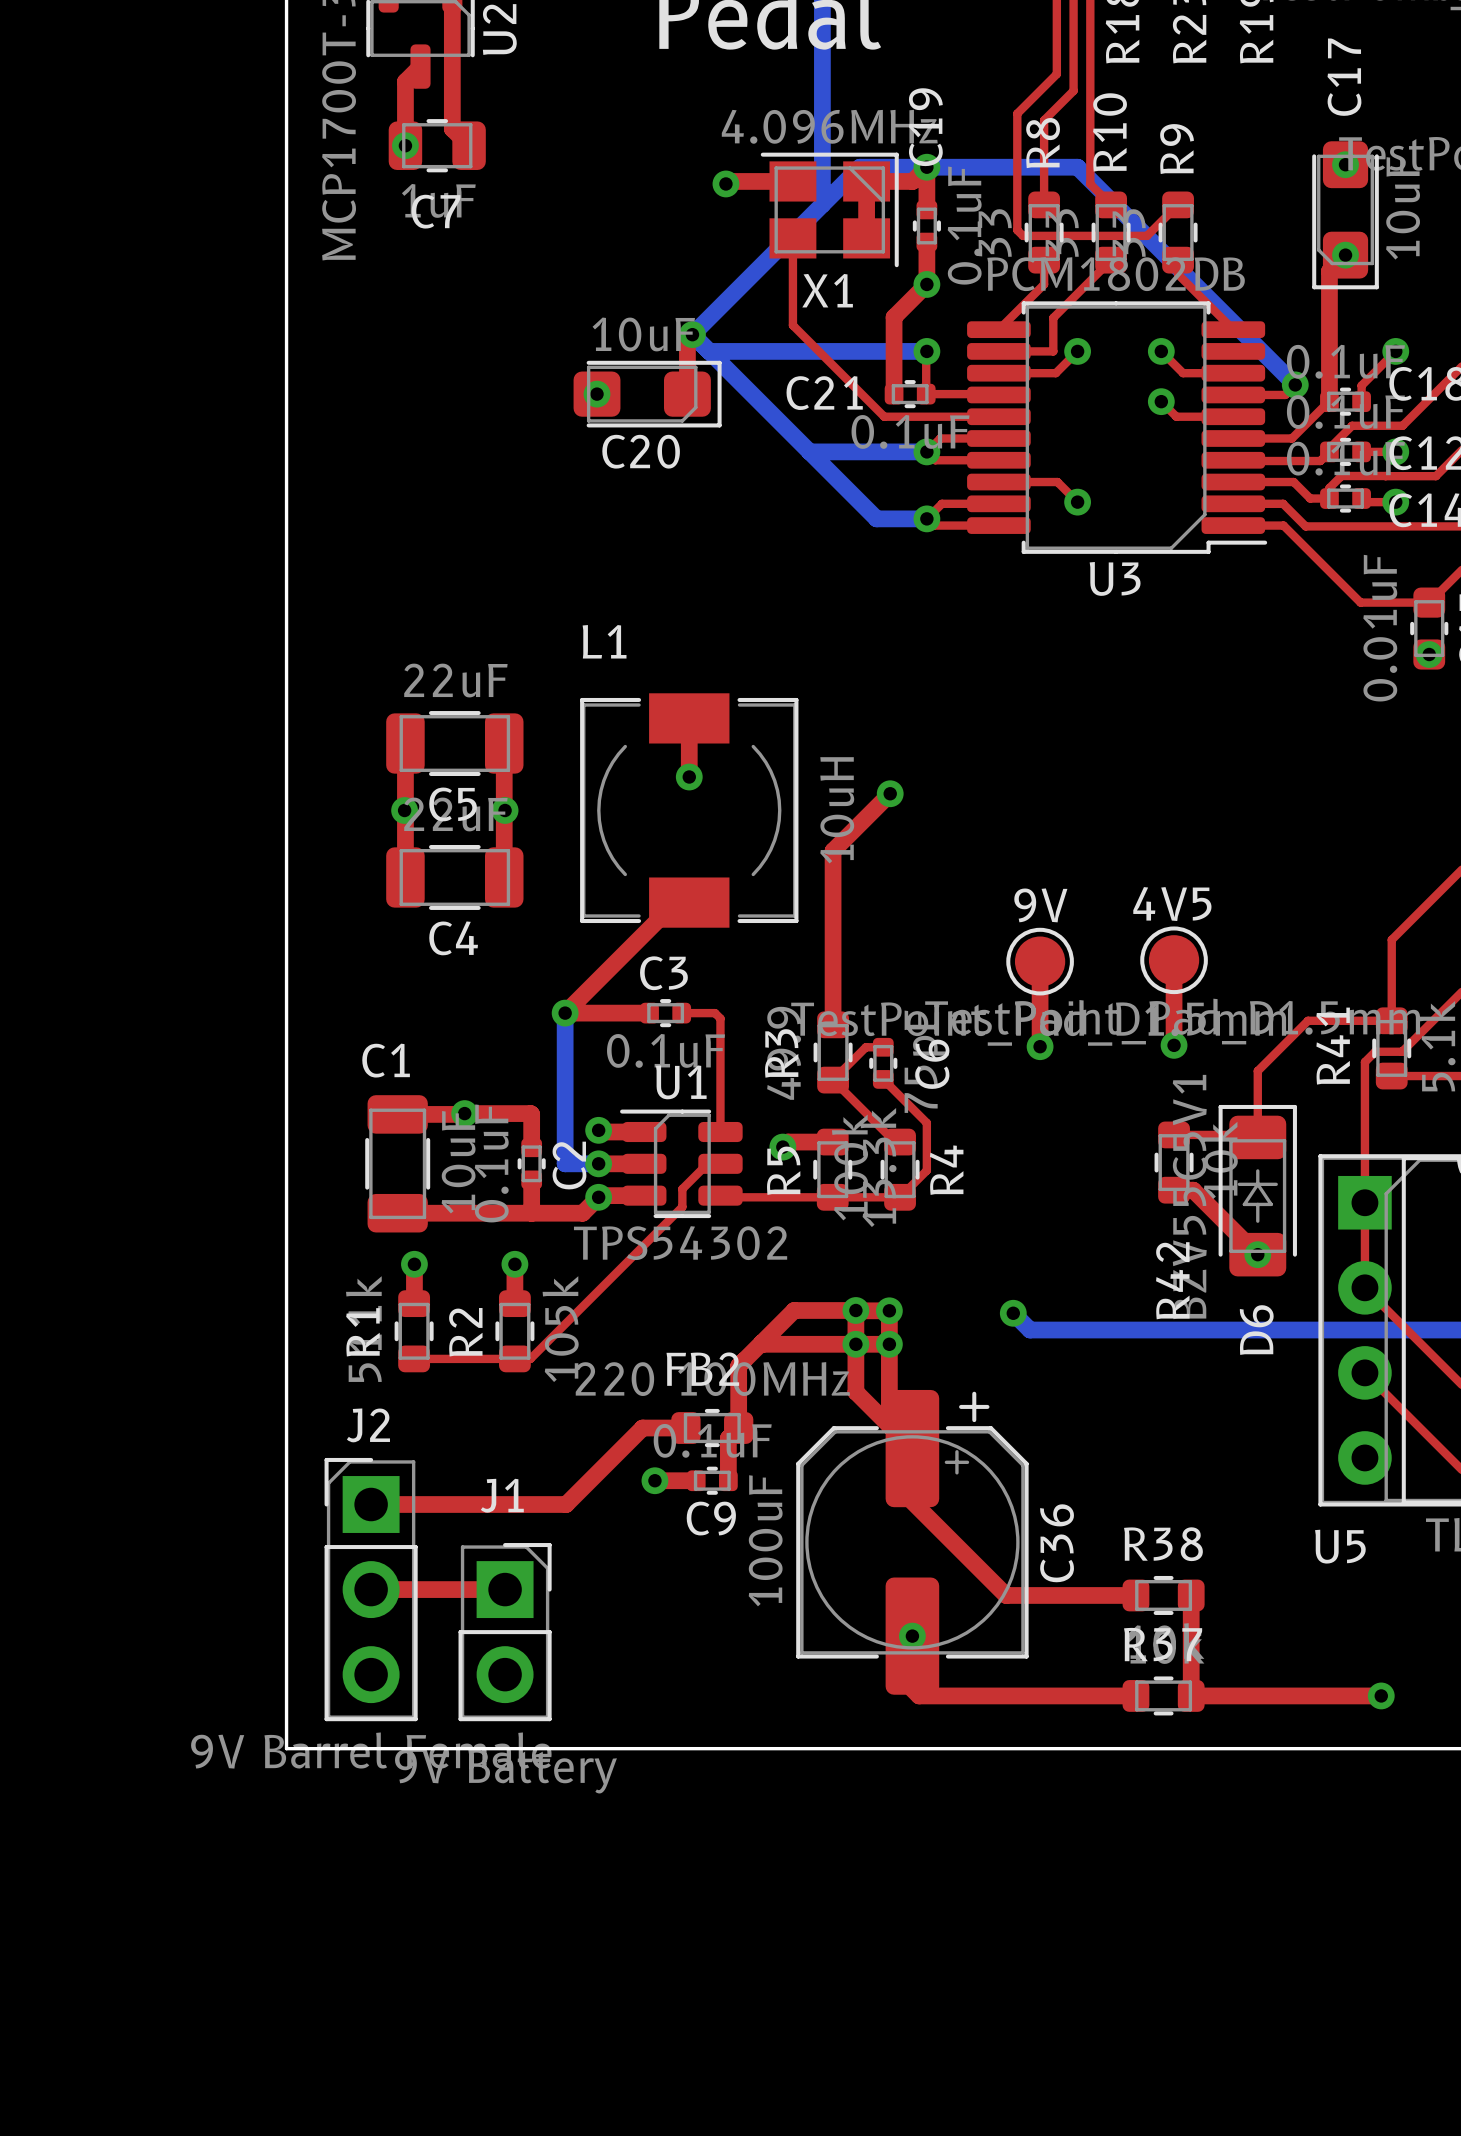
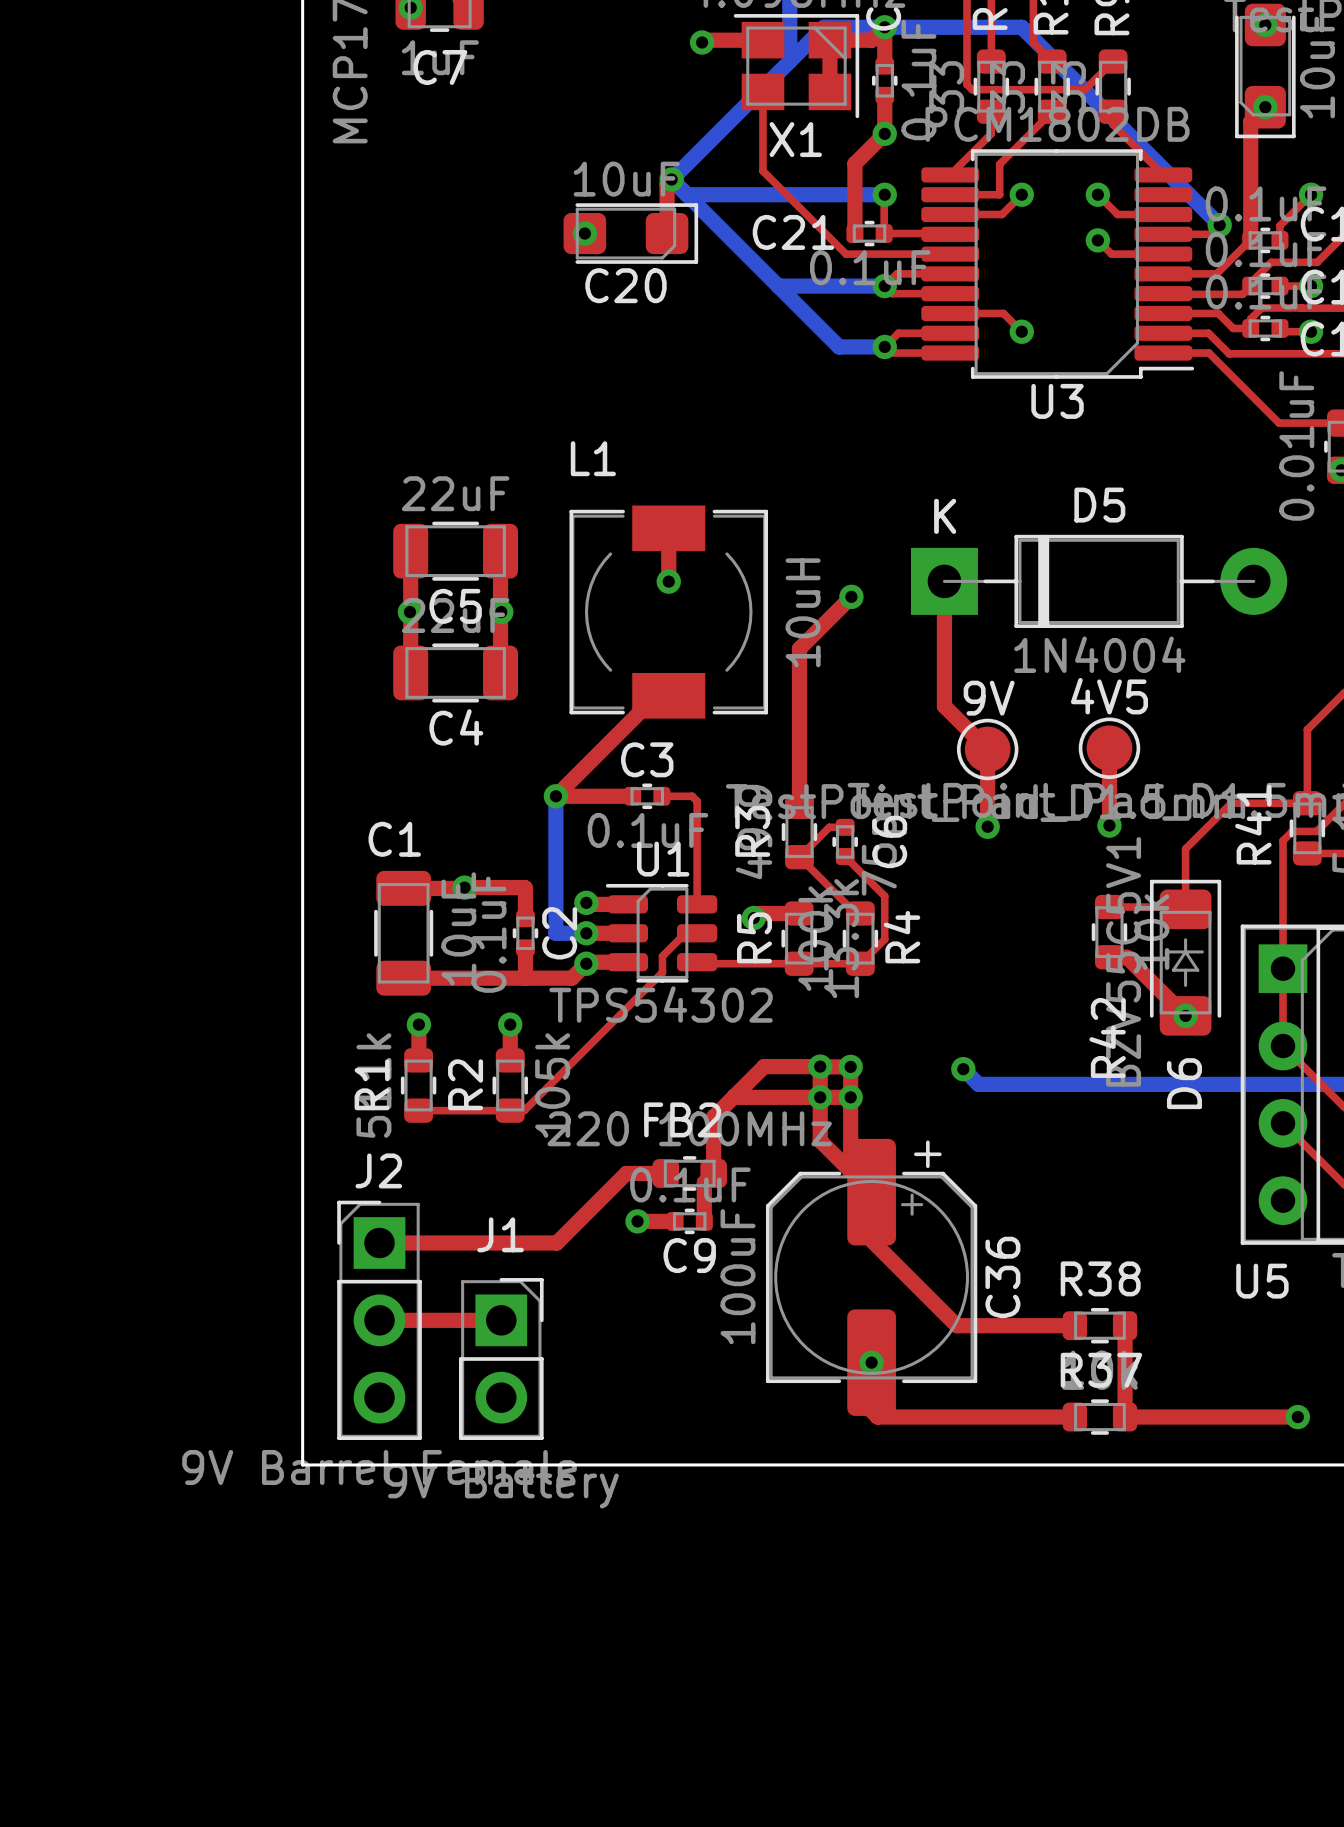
top track: none -> (944, 581) (944, 706) (987, 749)
D5: none -> 1N4004 (1099, 581)

